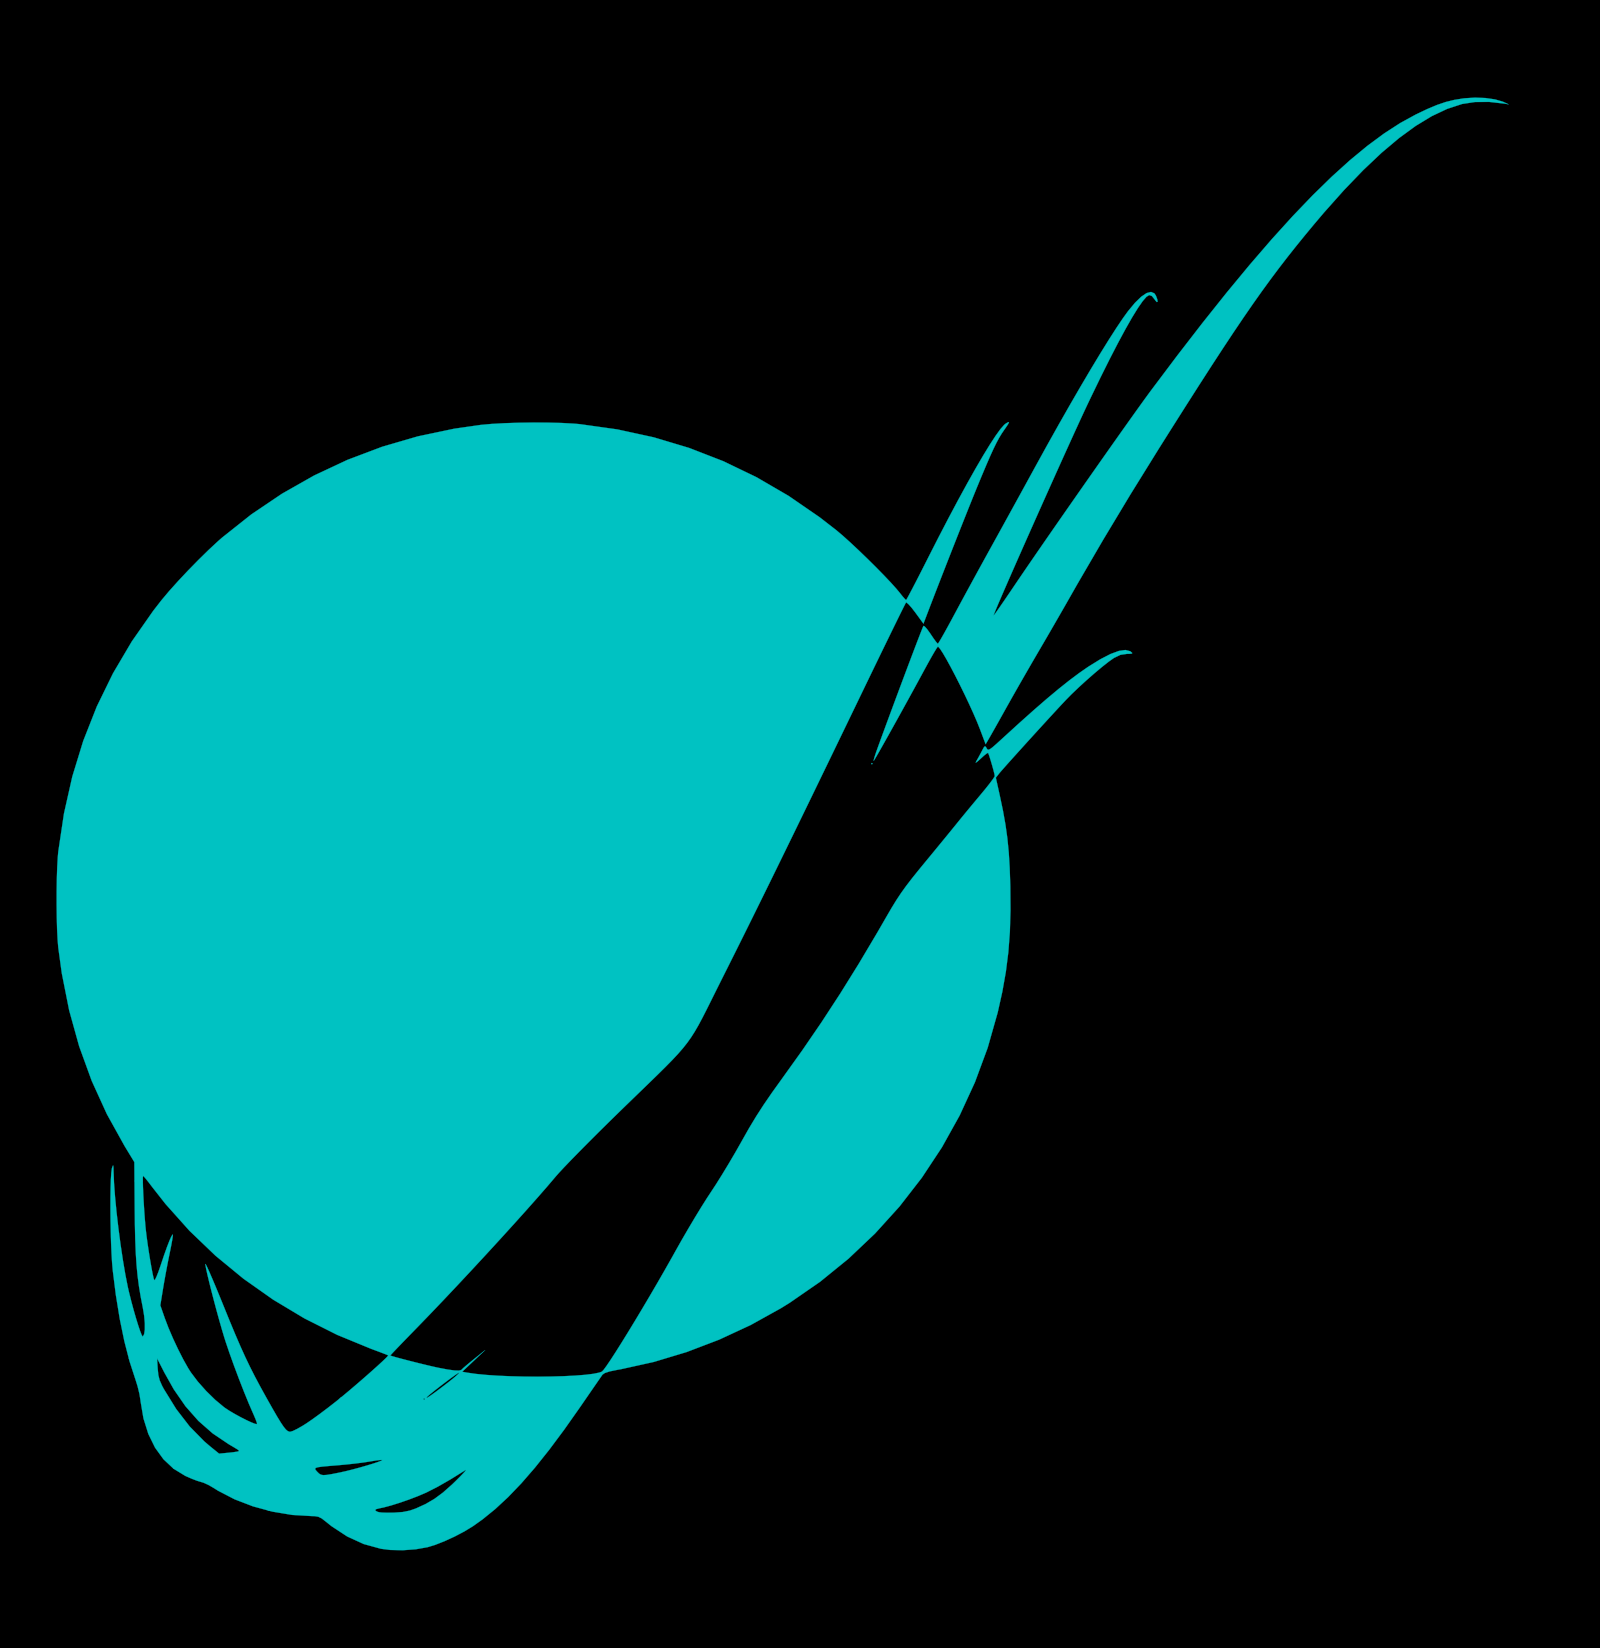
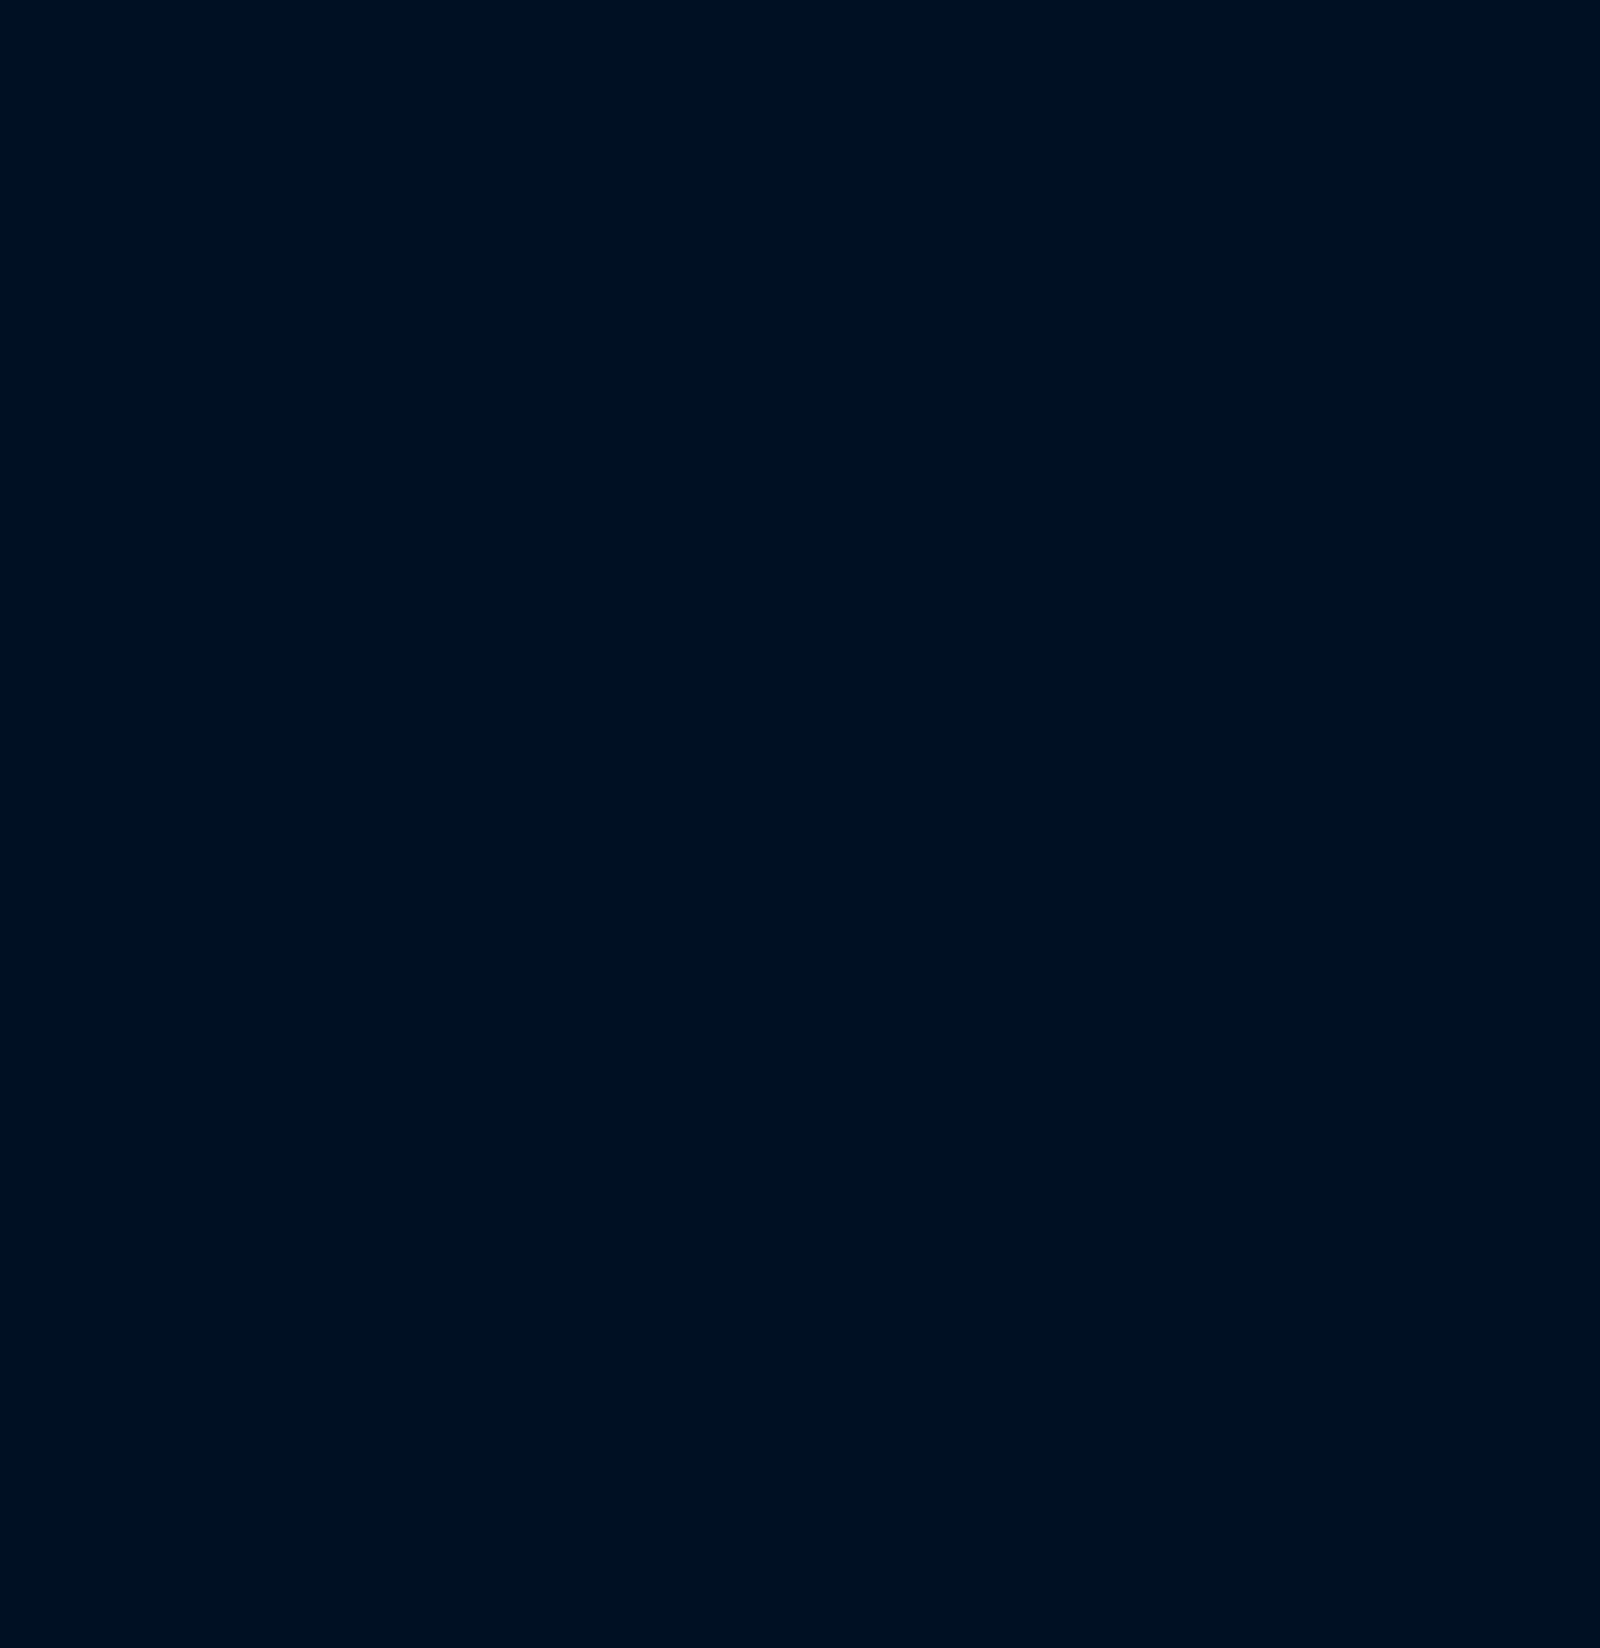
drawing: [56, 97, 1509, 1551] -> none

